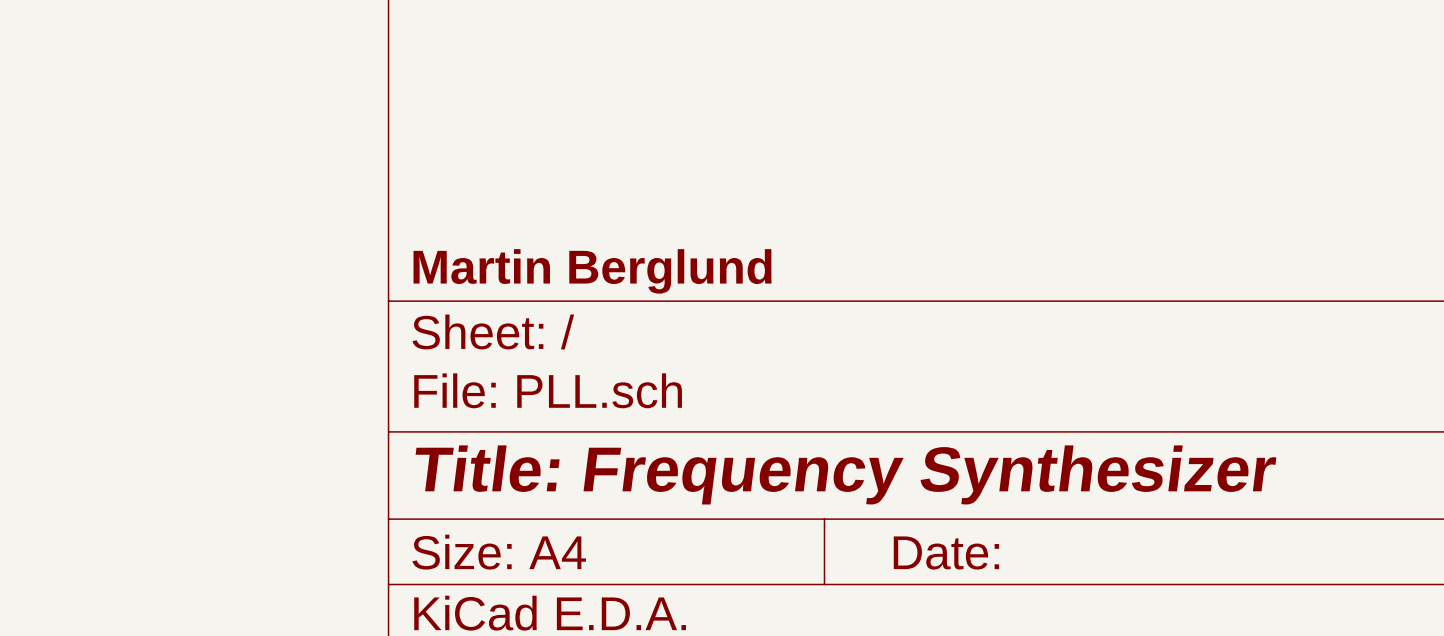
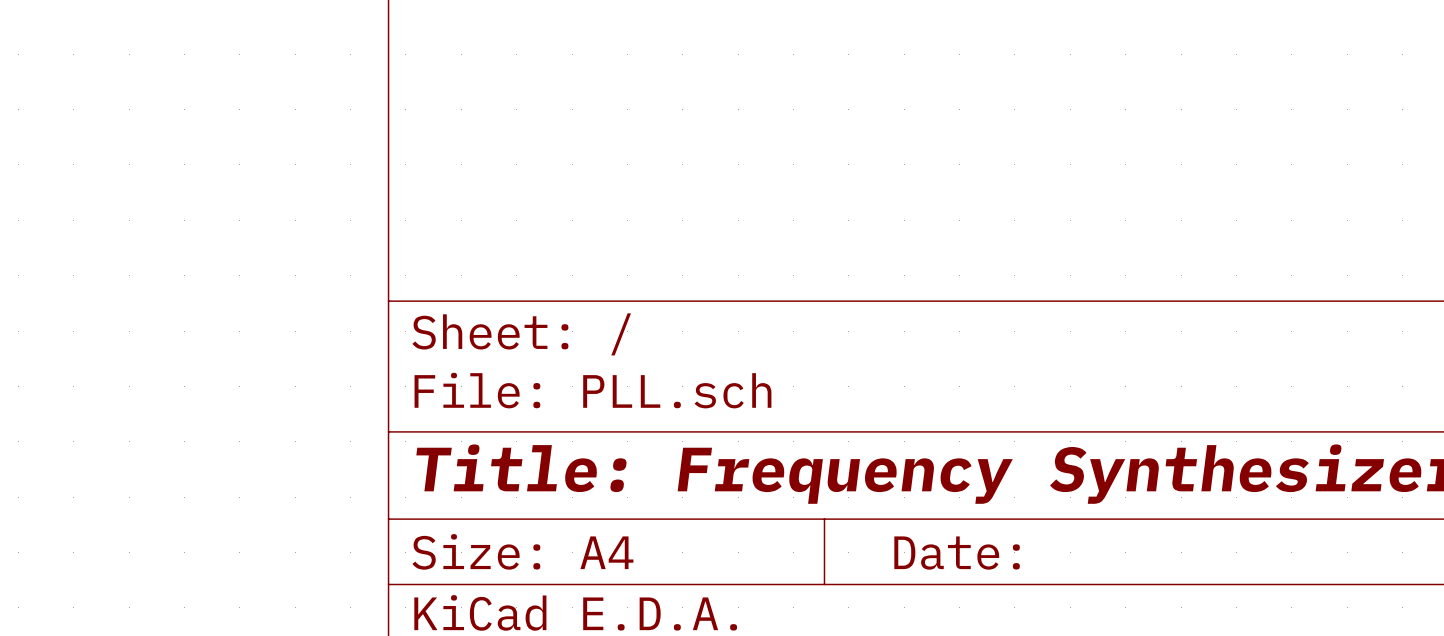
title block: Martin Berglund (592, 271) -> none

